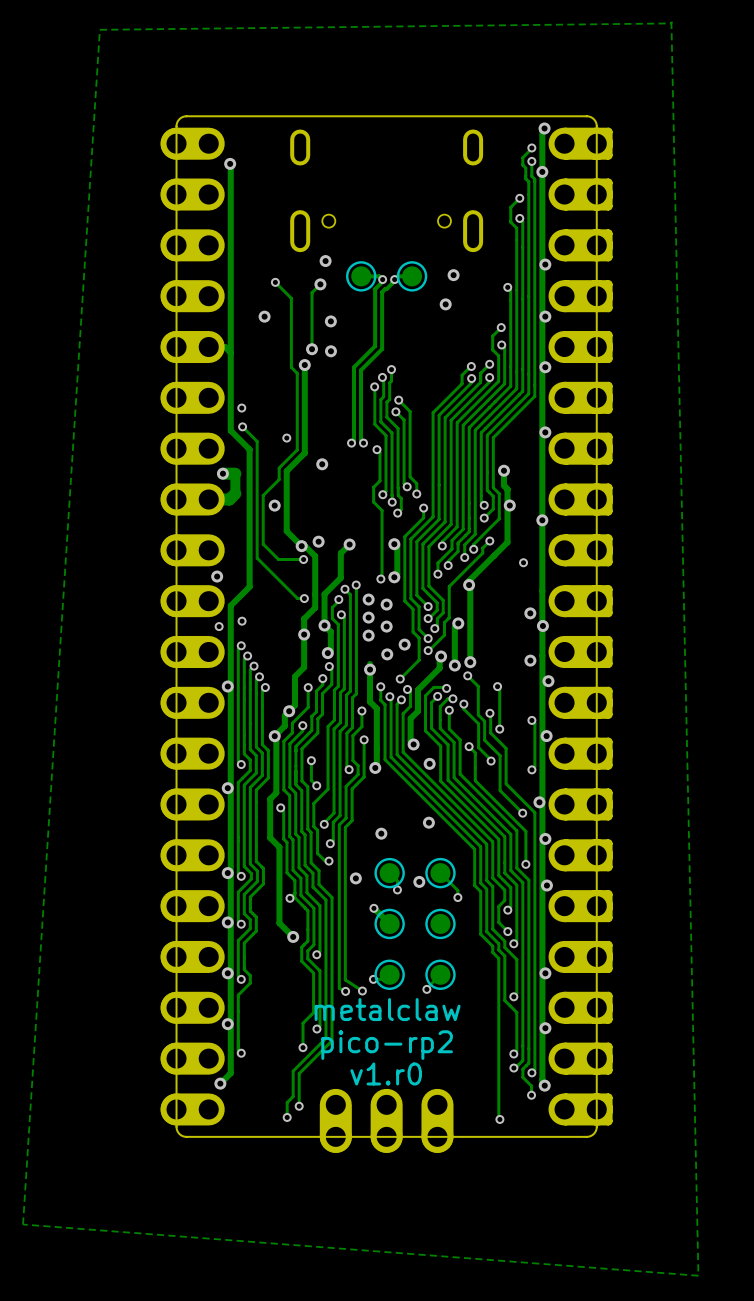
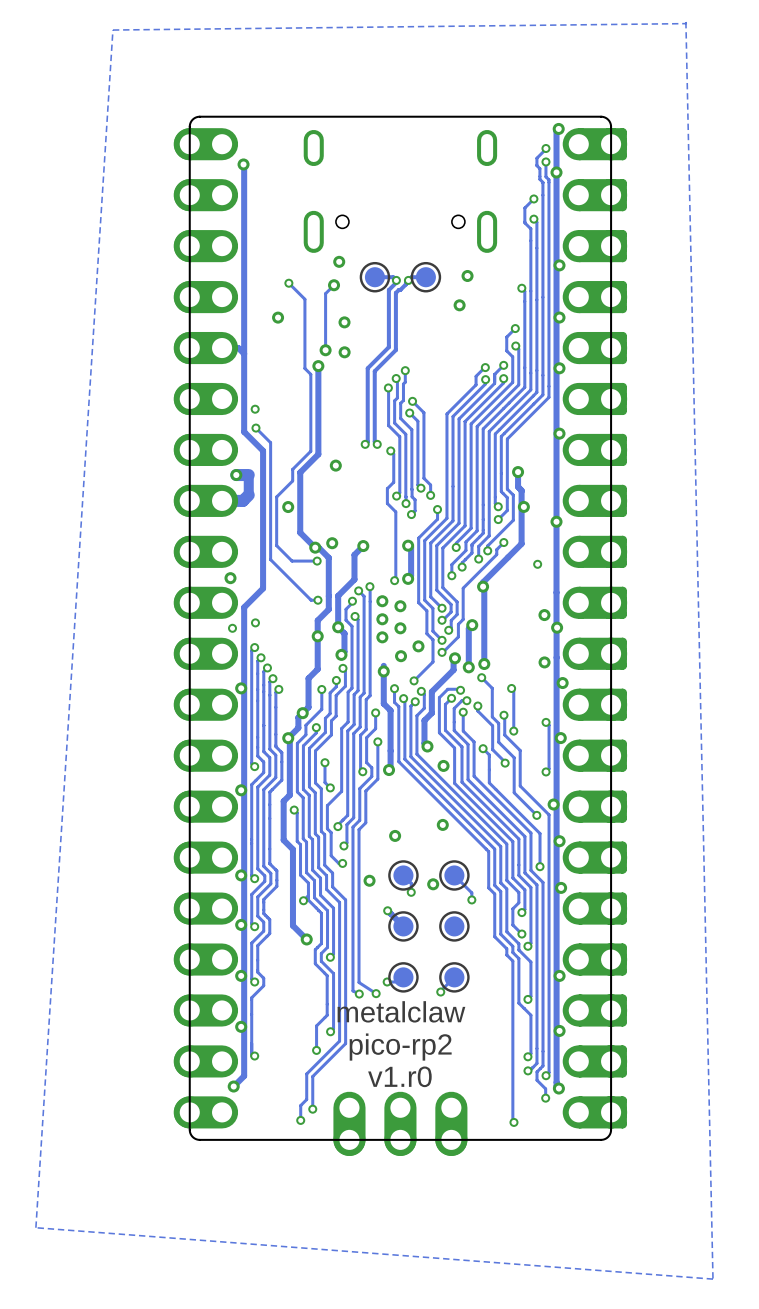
via: (286, 438) -> none

